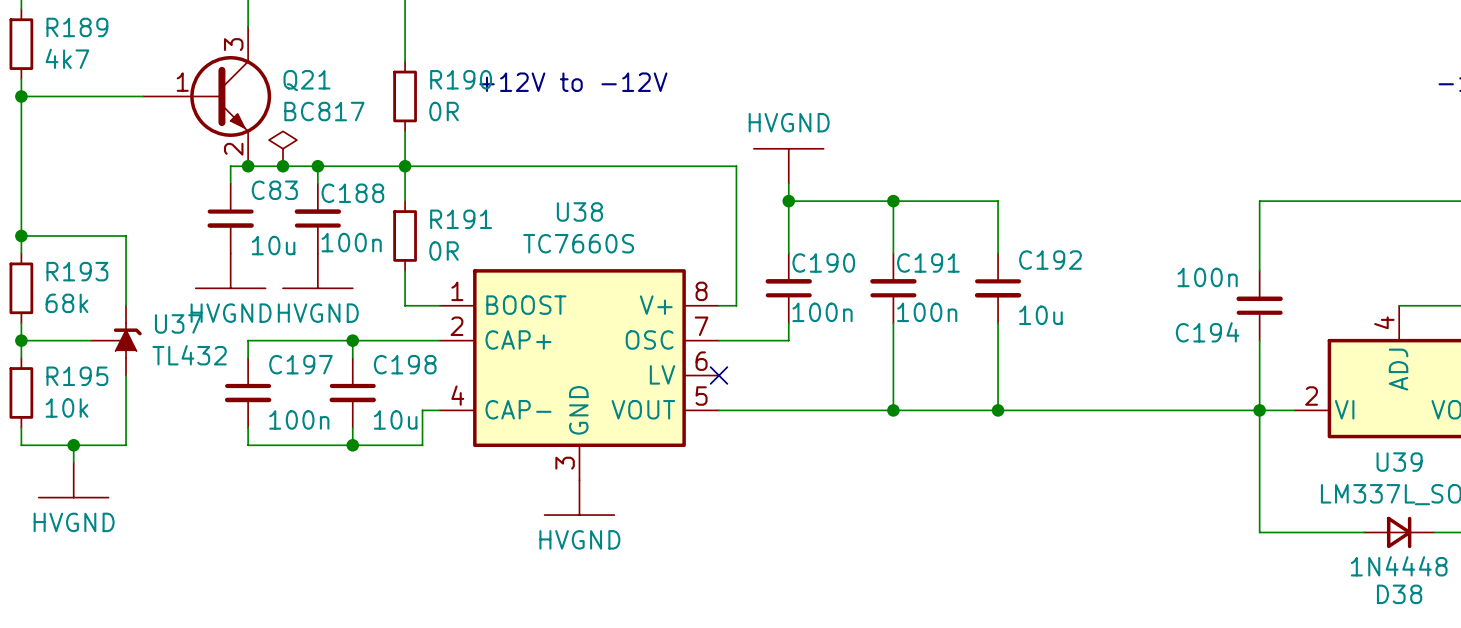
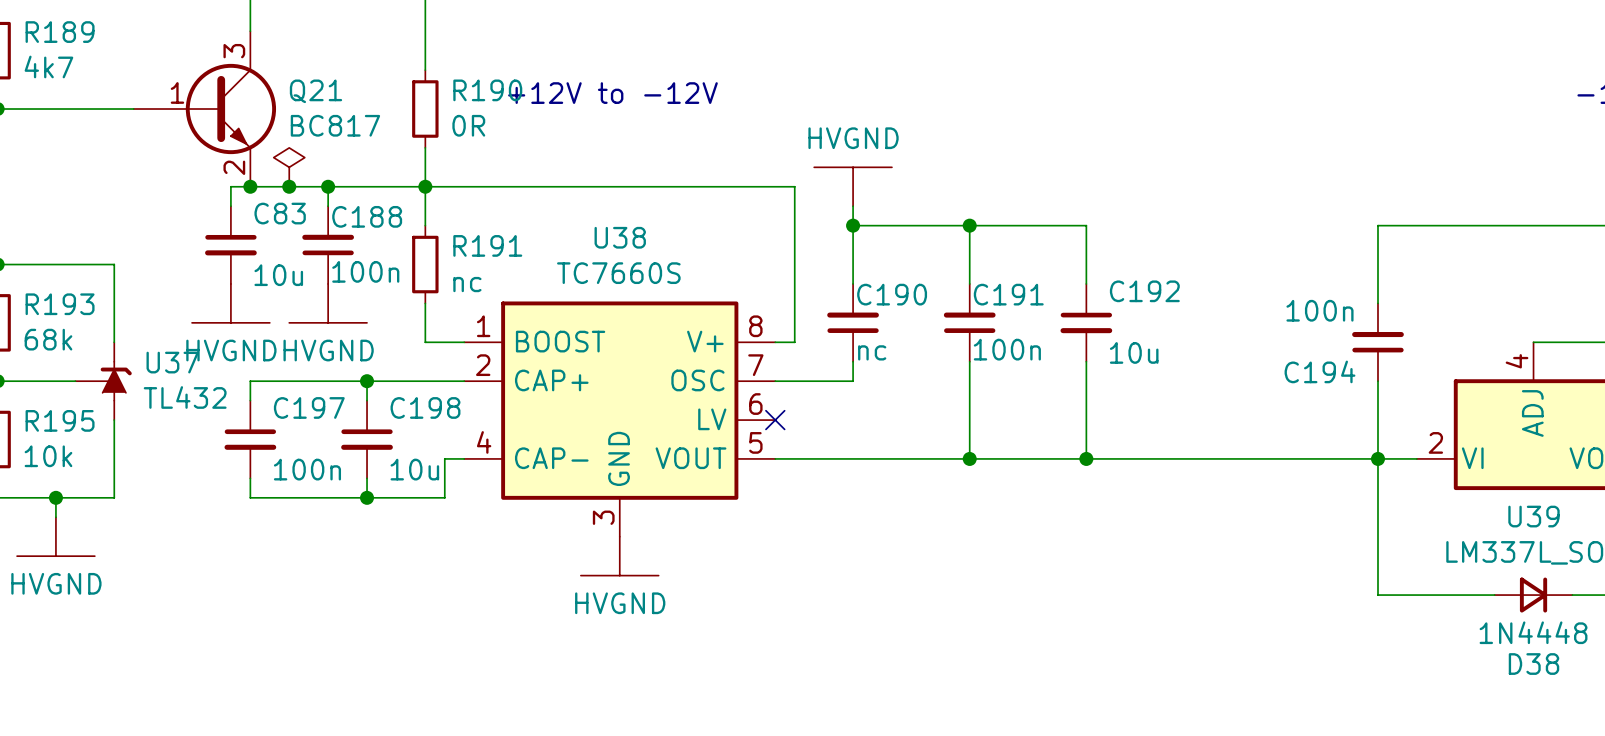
R191 value: 0R (444, 251) -> nc (467, 284)
C190 value: 100n (822, 312) -> nc (872, 352)

